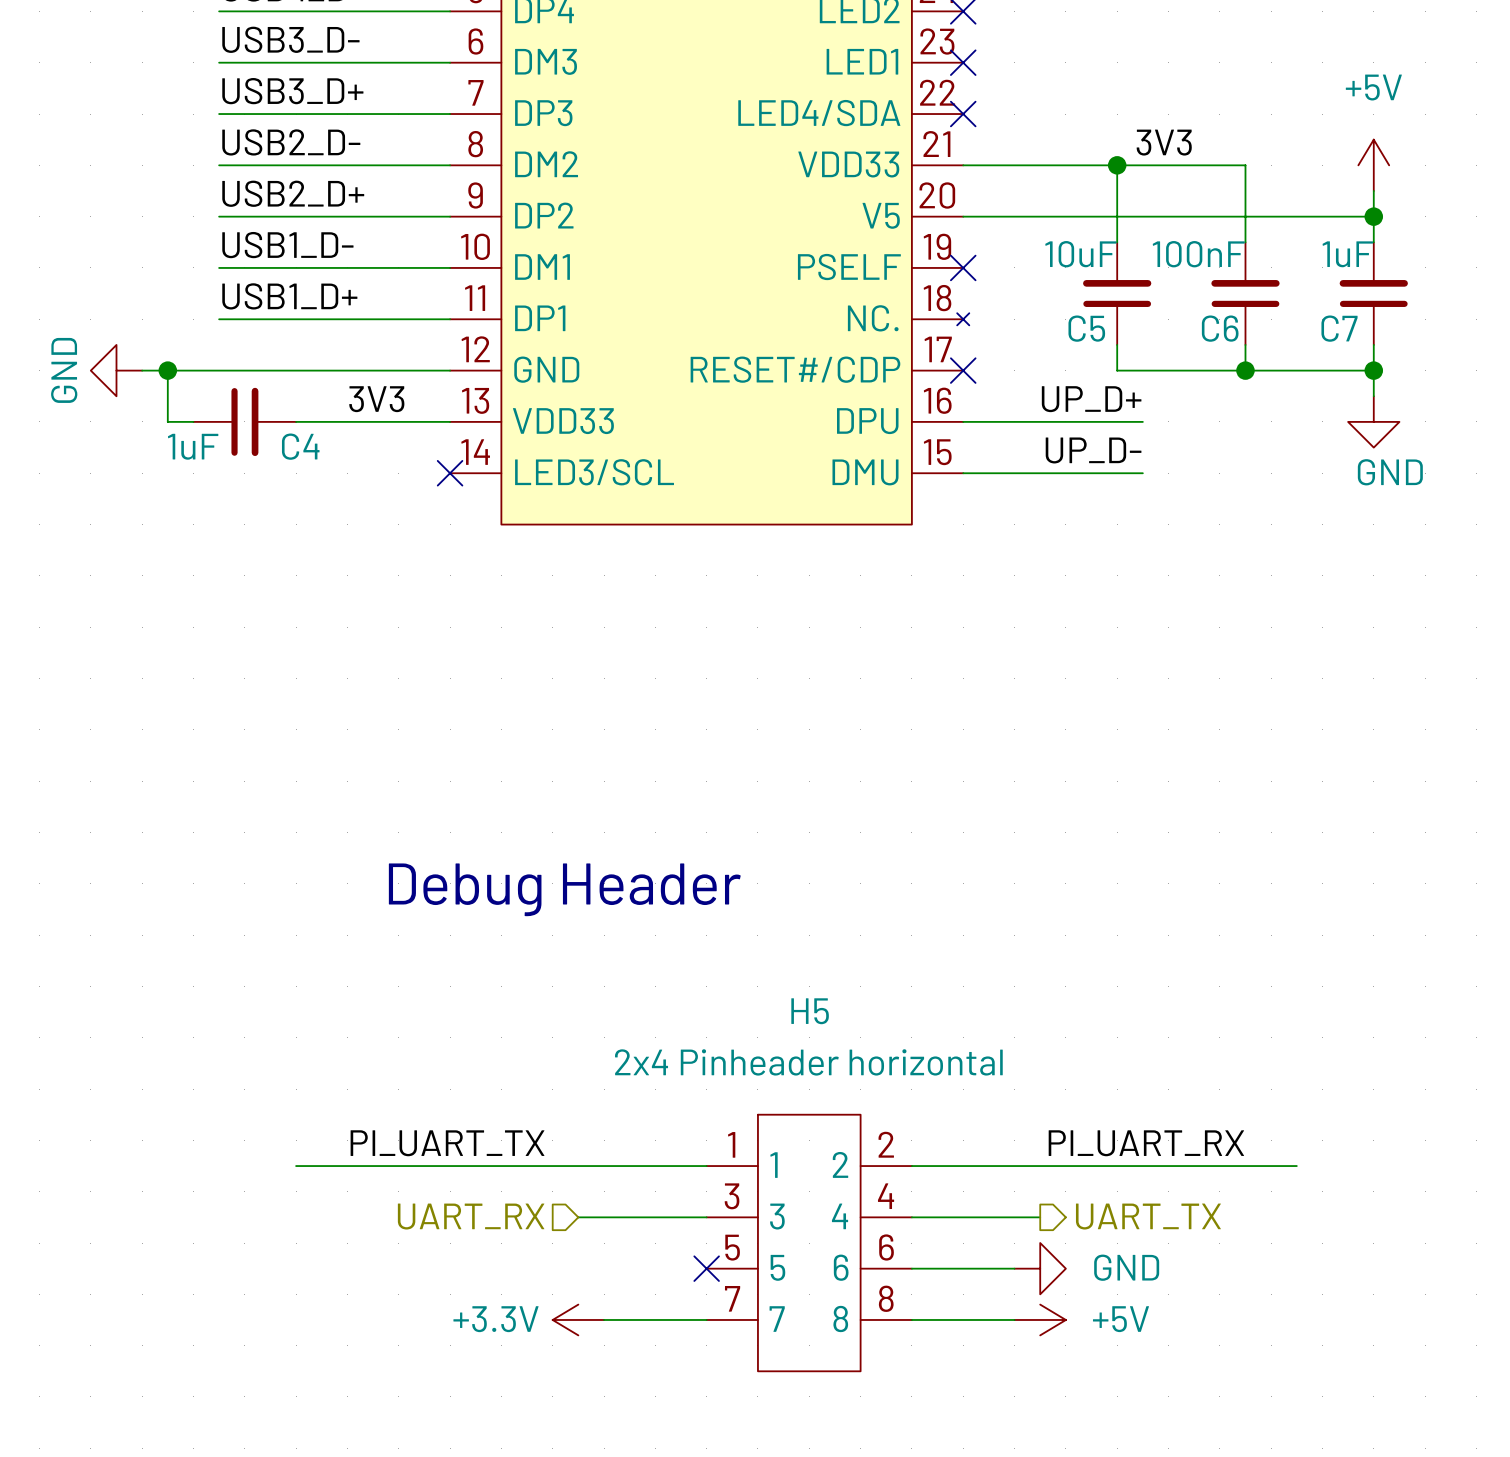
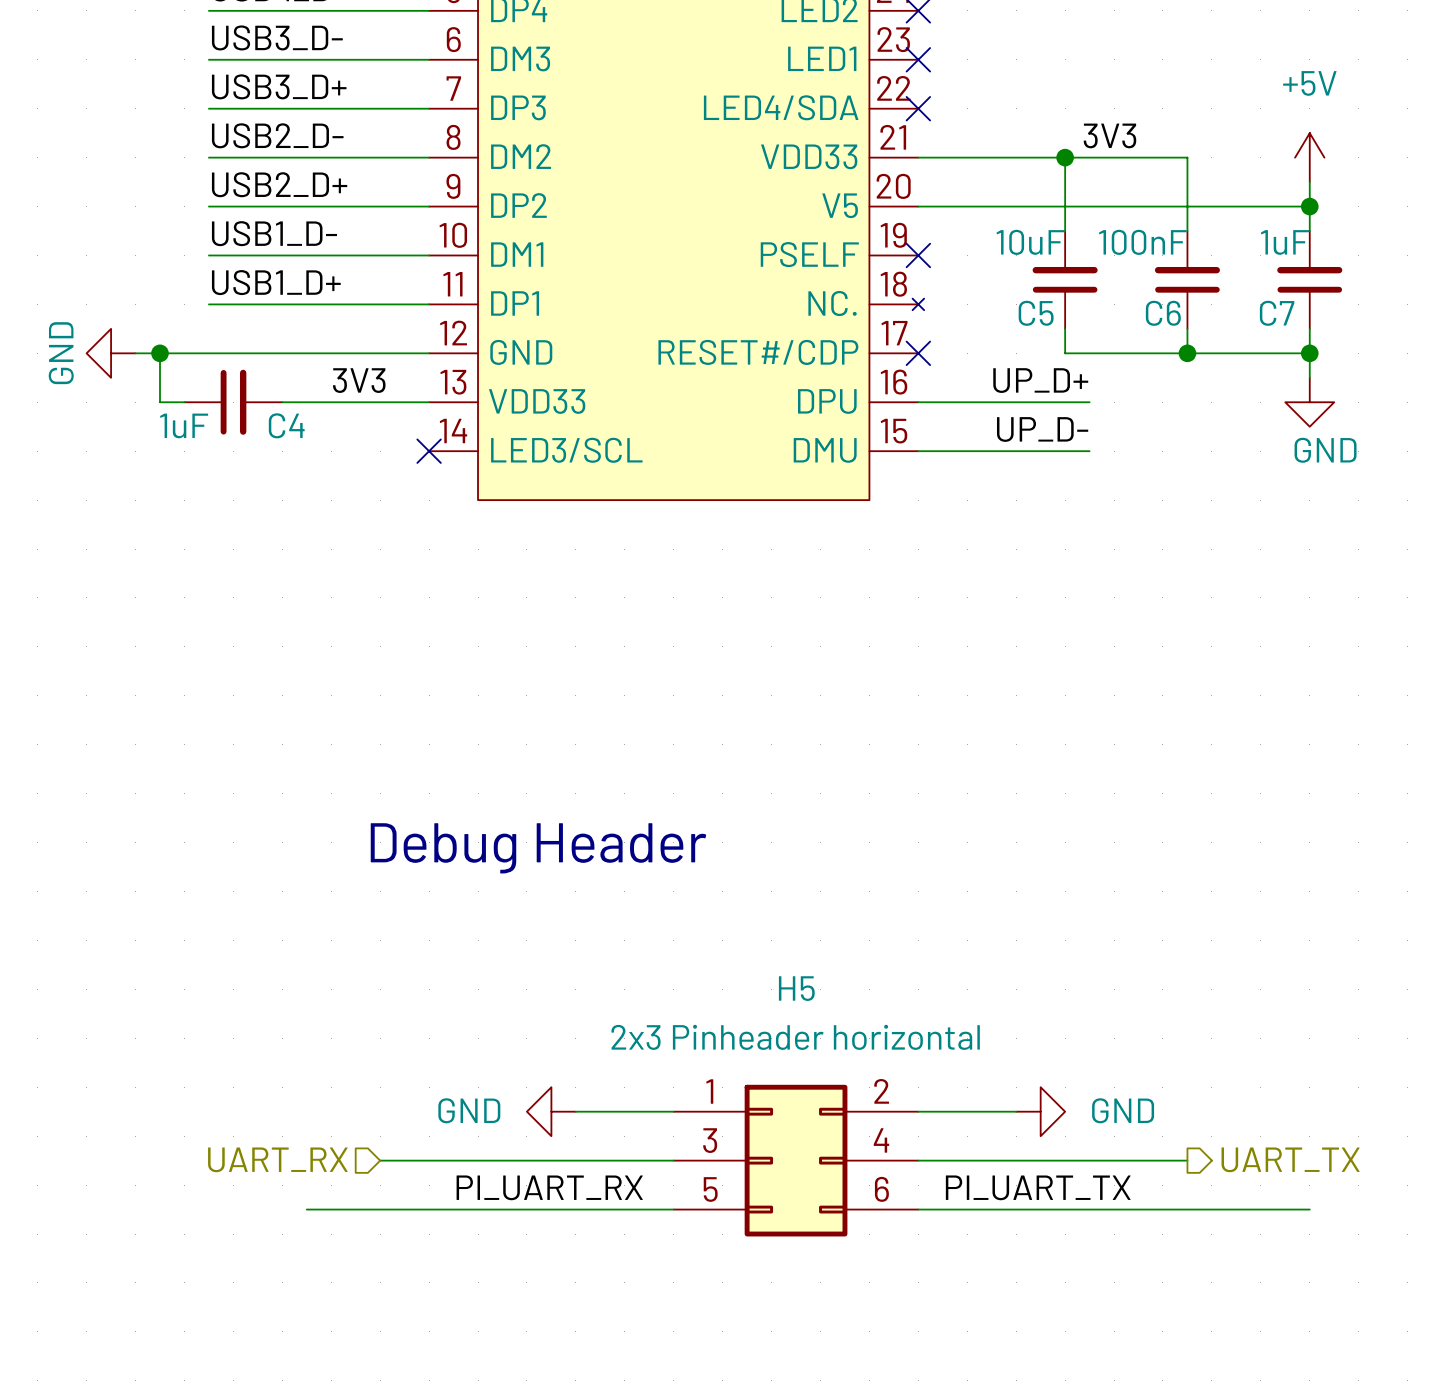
H5 name position: H5 (810, 1011) -> H5 (796, 988)
H5 value: 2x4 Pinheader horizontal (808, 1062) -> 2x3 Pinheader horizontal (795, 1037)
H5 symbol: [706, 1114, 912, 1372] -> [673, 1084, 919, 1237]
label: PI_UART_TX (447, 1143) -> none
label: PI_UART_RX (1146, 1143) -> none
wire: (296, 1166) (604, 1166) -> none
power symbol: none -> GND (551, 1111)
wire: (1065, 1166) (1296, 1166) -> none
hierarchical label position: UART_RX (471, 1216) -> UART_RX (277, 1159)
hierarchical label position: UART_TX (1148, 1216) -> UART_TX (1290, 1159)
wire: none -> (380, 1160) (551, 1160)
wire: none -> (991, 1160) (1187, 1160)
label: none -> PI_UART_RX (549, 1187)
label: none -> PI_UART_TX (1038, 1187)
wire: none -> (306, 1209) (673, 1209)
no-connect mark: (706, 1268) -> none
wire: none -> (967, 1209) (1309, 1209)
power symbol position: GND (1040, 1268) -> GND (1040, 1111)
power symbol: +3.3V (578, 1319) -> none
wire: (604, 1319) (706, 1319) -> none
wire: (911, 1319) (1014, 1319) -> none
power symbol: +5V (1040, 1319) -> none

